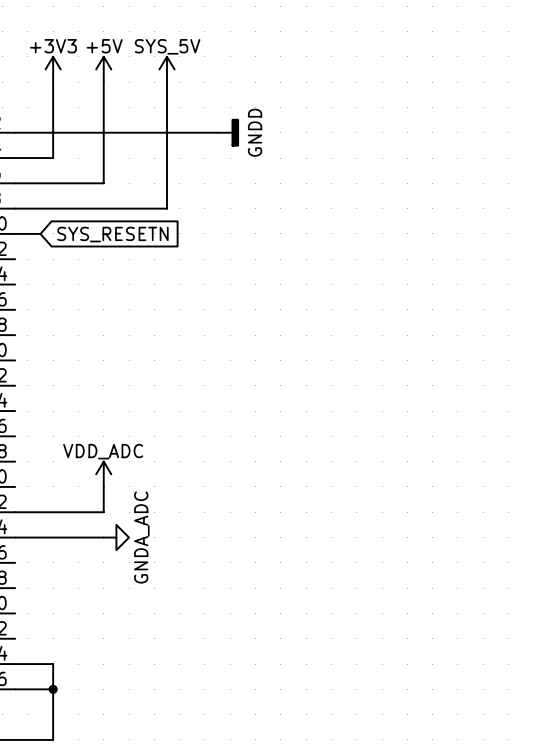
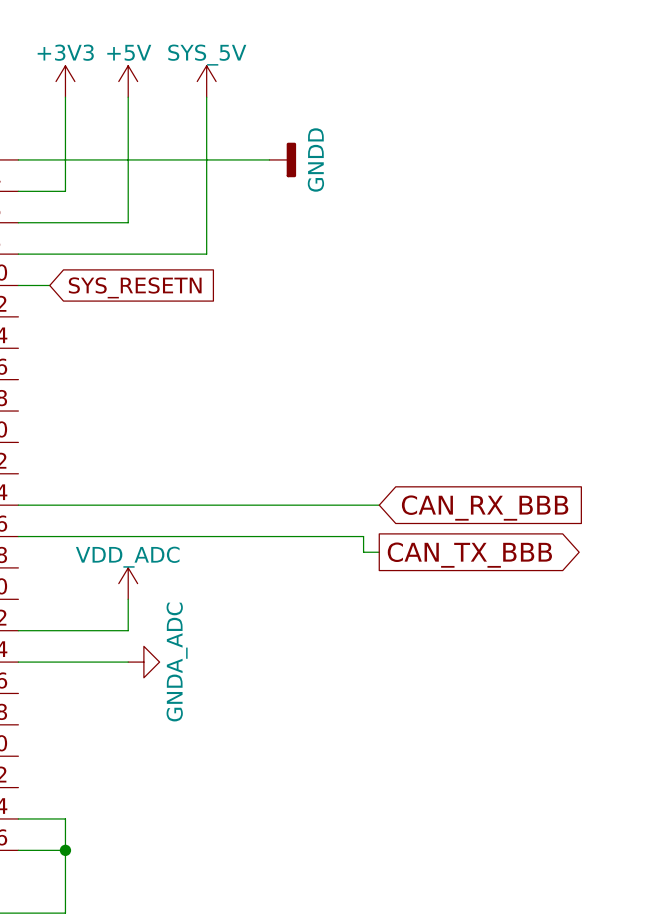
wire: none -> (18, 505) (379, 505)
global label: none -> CAN_RX_BBB (485, 508)
wire: none -> (18, 536) (363, 536) (363, 552) (379, 552)
global label: none -> CAN_TX_BBB (469, 555)

